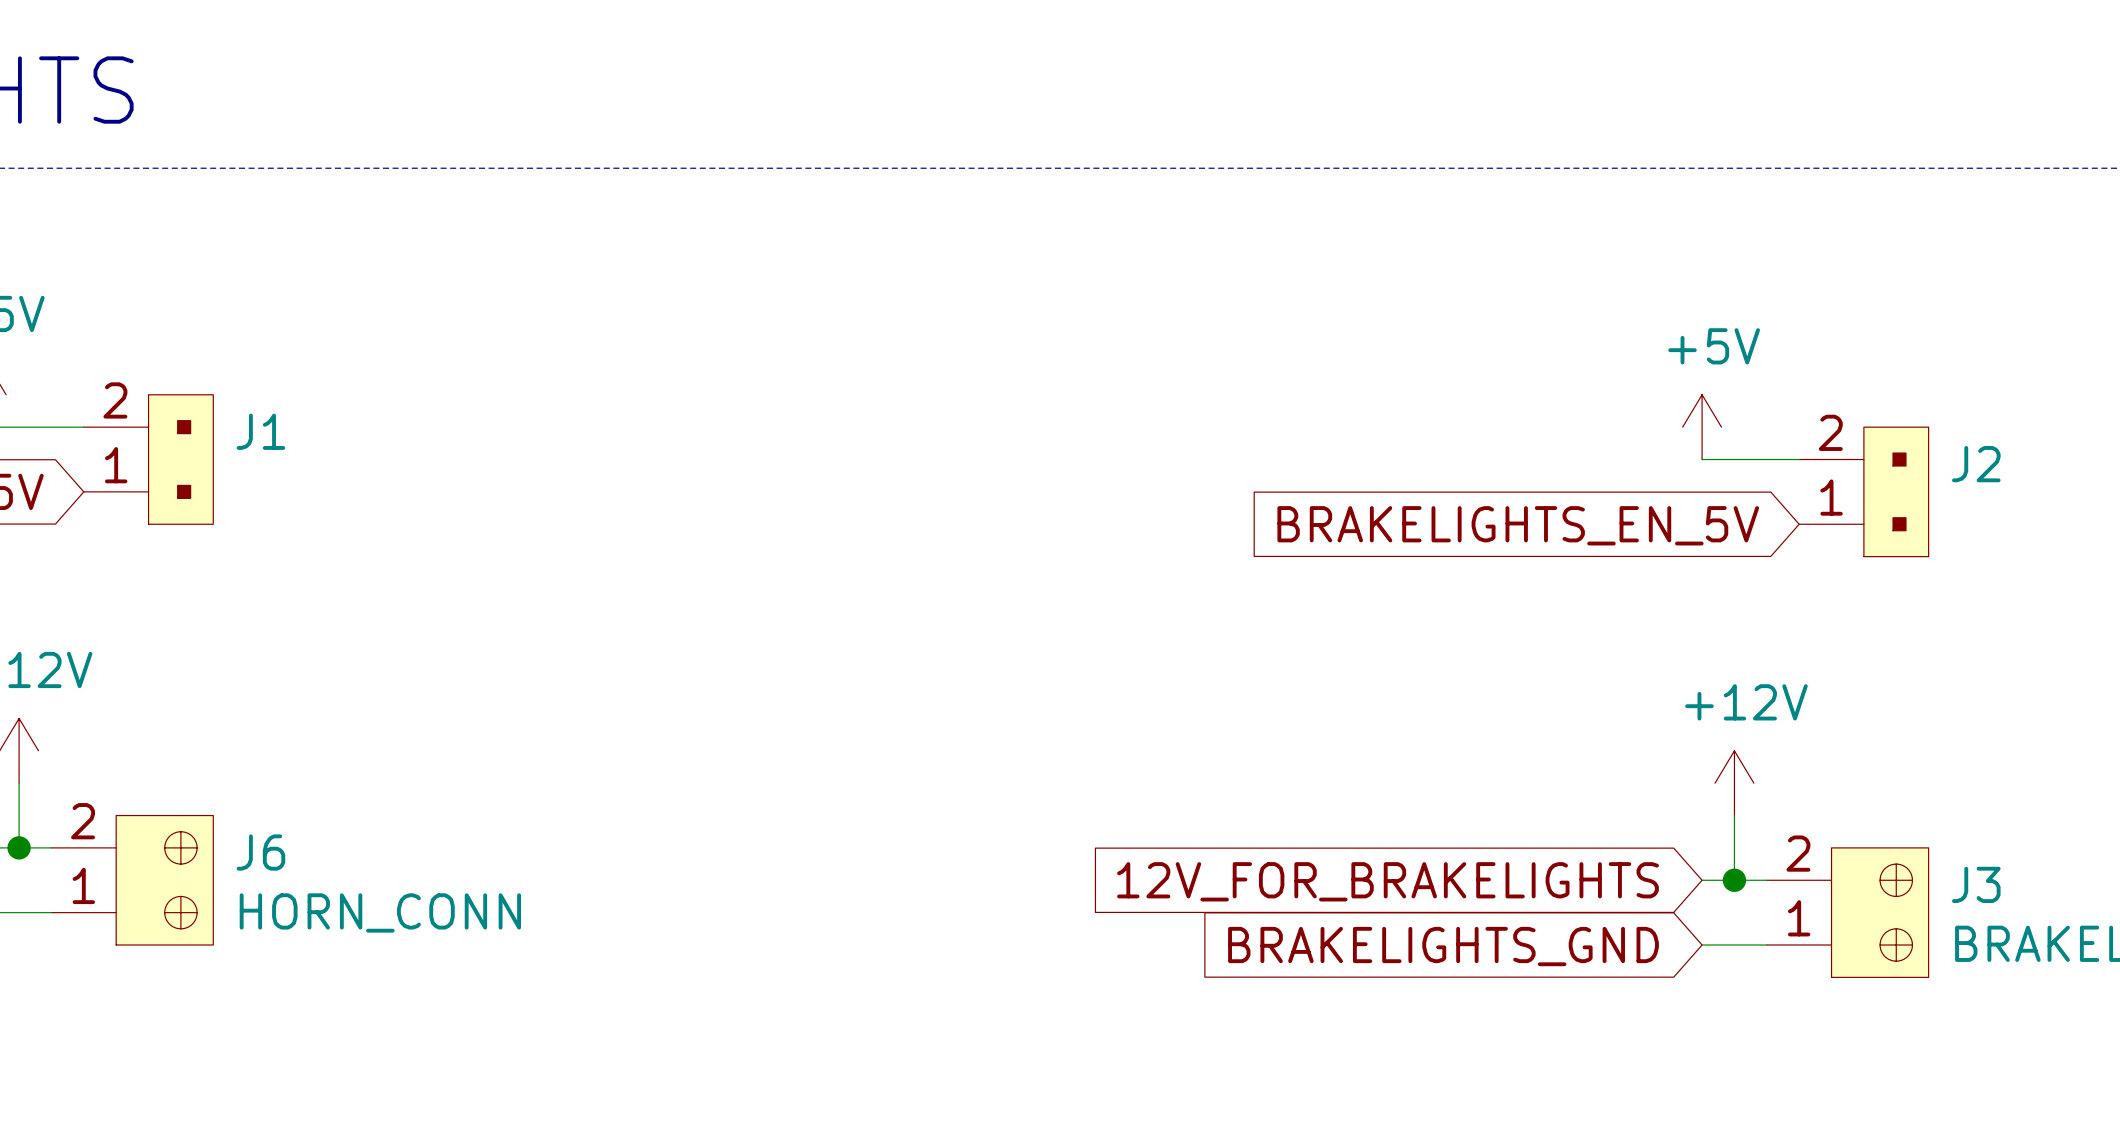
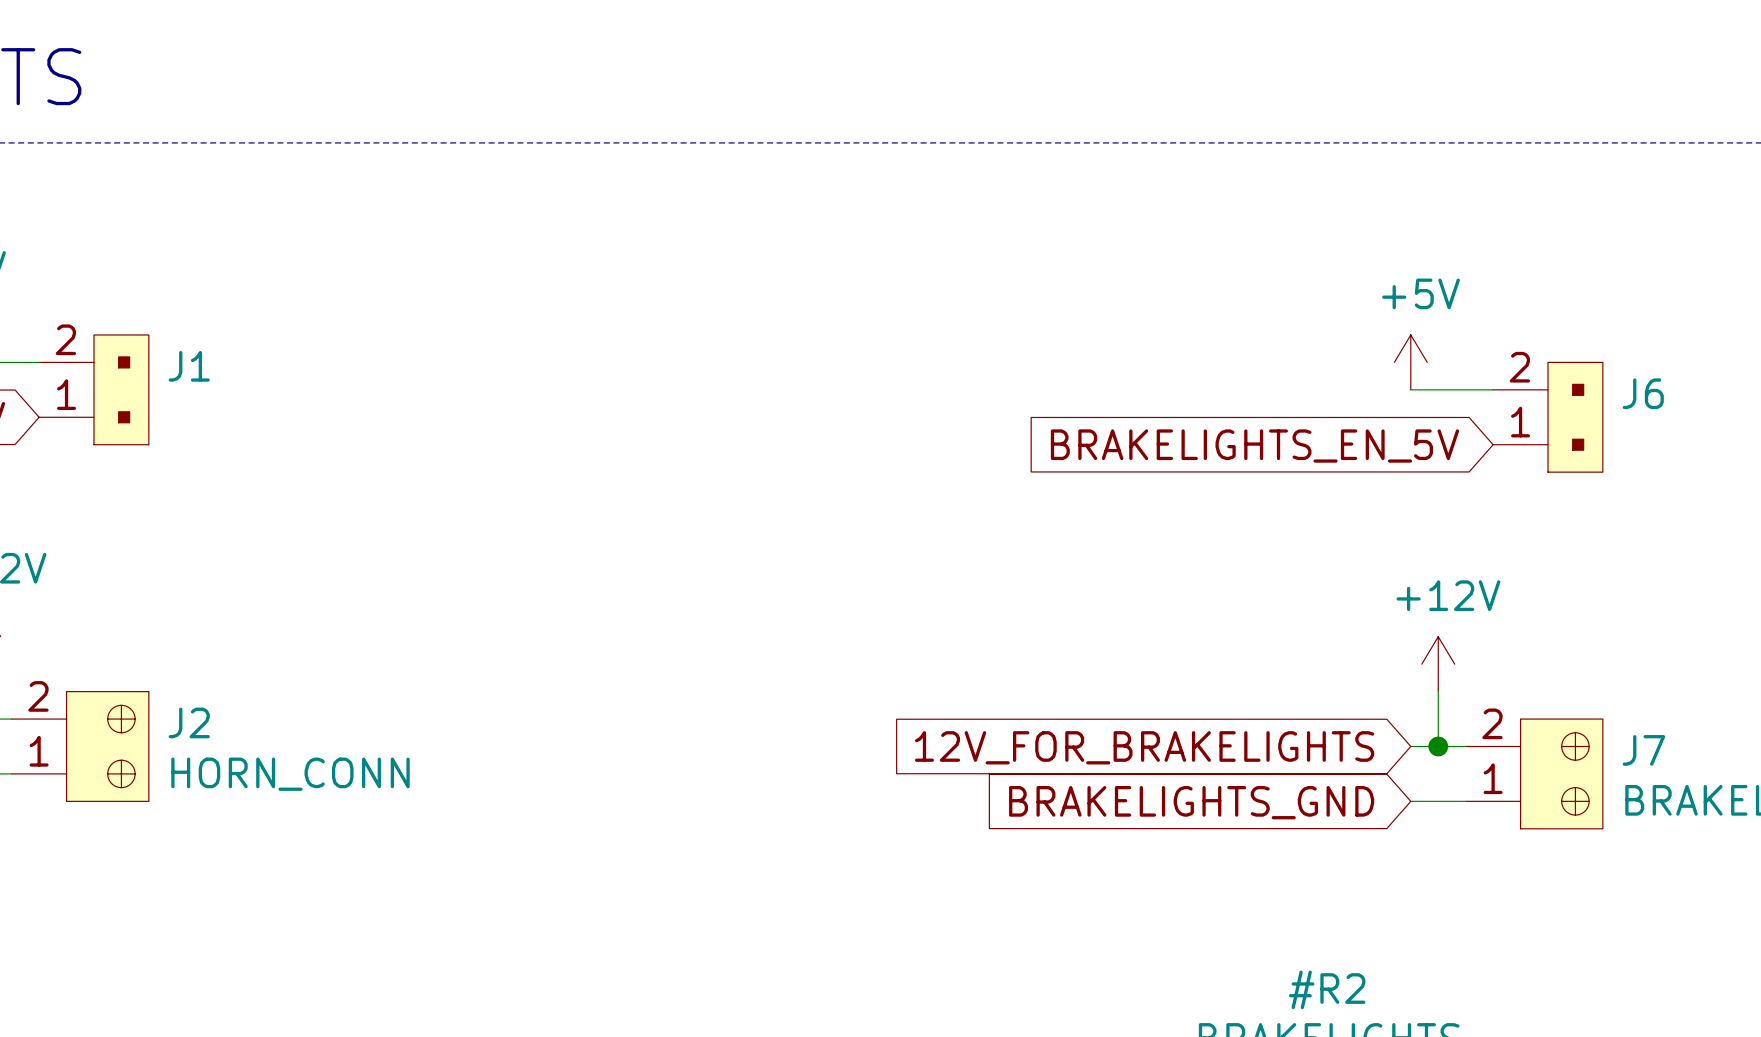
J2 name: J2 (1976, 464) -> J6 (1643, 393)
J6 name: J6 (260, 852) -> J2 (189, 722)
J3 name: J3 (1976, 884) -> J7 (1643, 750)

